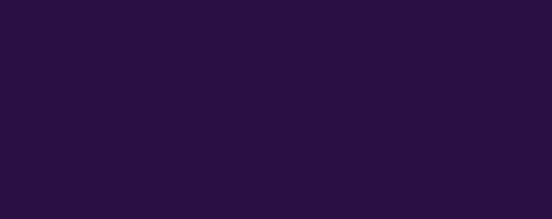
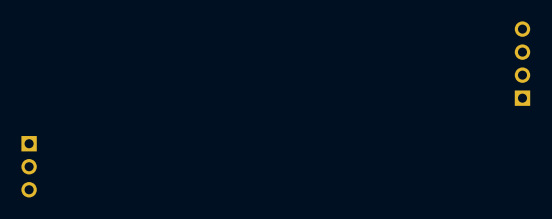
part: none -> (522, 63)
part: none -> (29, 166)

